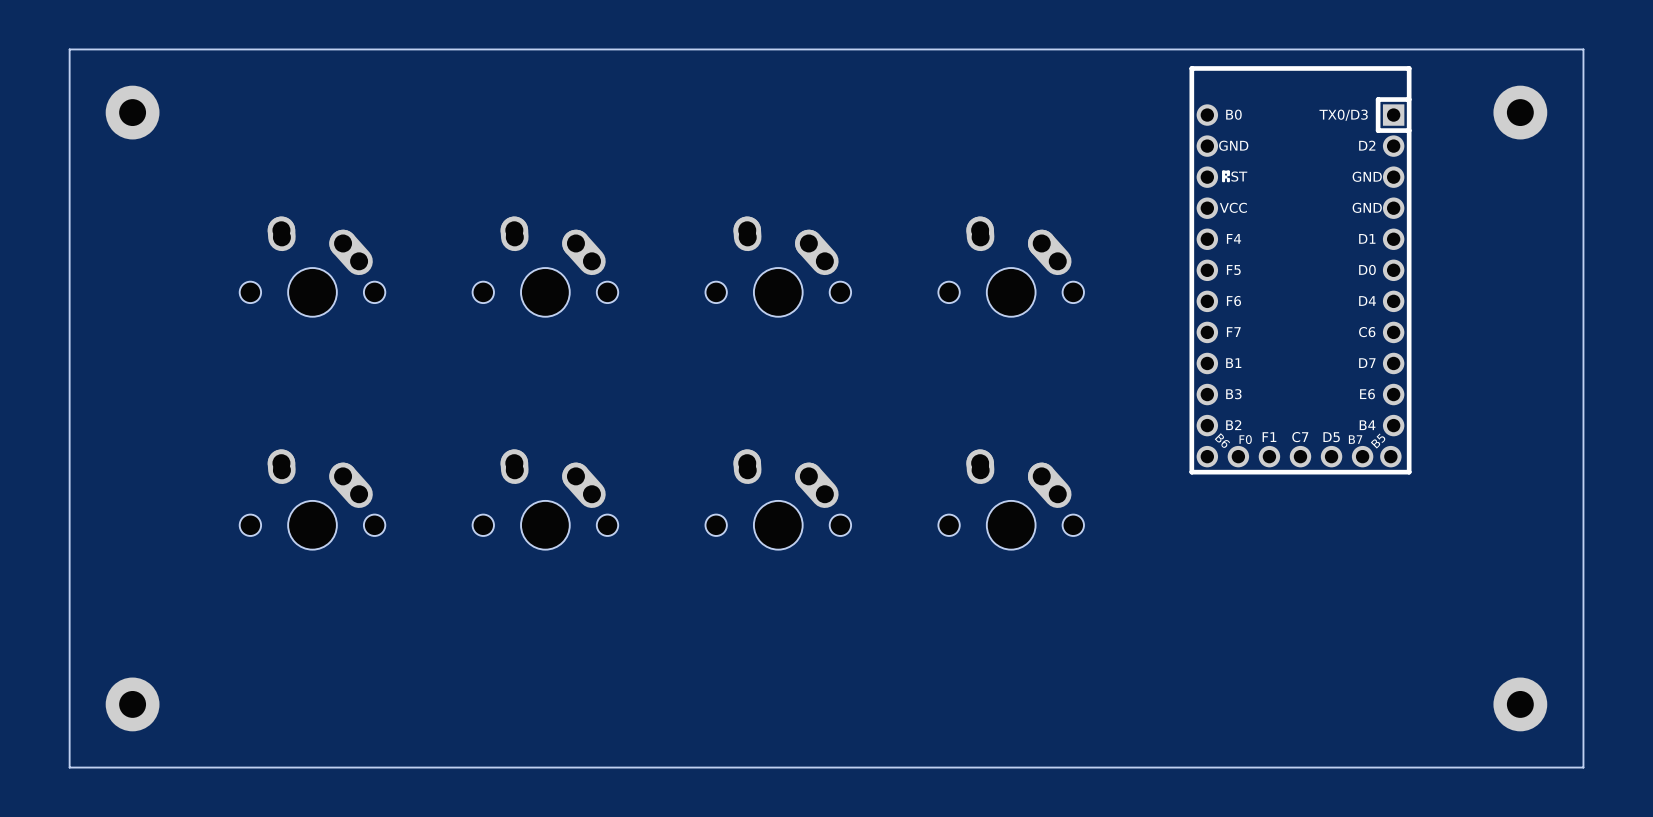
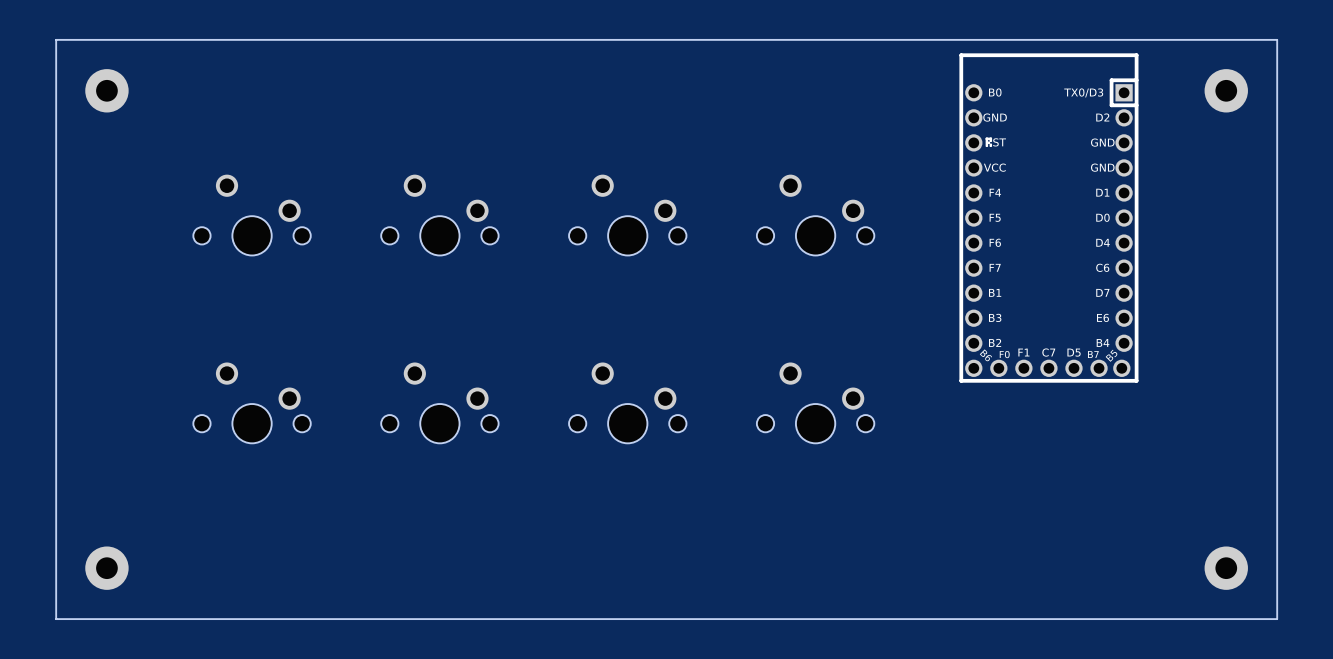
part footprint: [239, 216, 386, 317] -> [193, 174, 311, 256]
part footprint: [472, 216, 619, 317] -> [381, 174, 499, 256]
part footprint: [705, 216, 852, 317] -> [569, 174, 687, 256]
part footprint: [938, 216, 1084, 317] -> [756, 174, 875, 256]
part footprint: [239, 449, 386, 550] -> [193, 362, 311, 444]
part footprint: [472, 449, 619, 550] -> [381, 362, 499, 444]
part footprint: [705, 449, 852, 550] -> [569, 362, 687, 444]
part footprint: [938, 449, 1084, 550] -> [756, 362, 875, 444]

